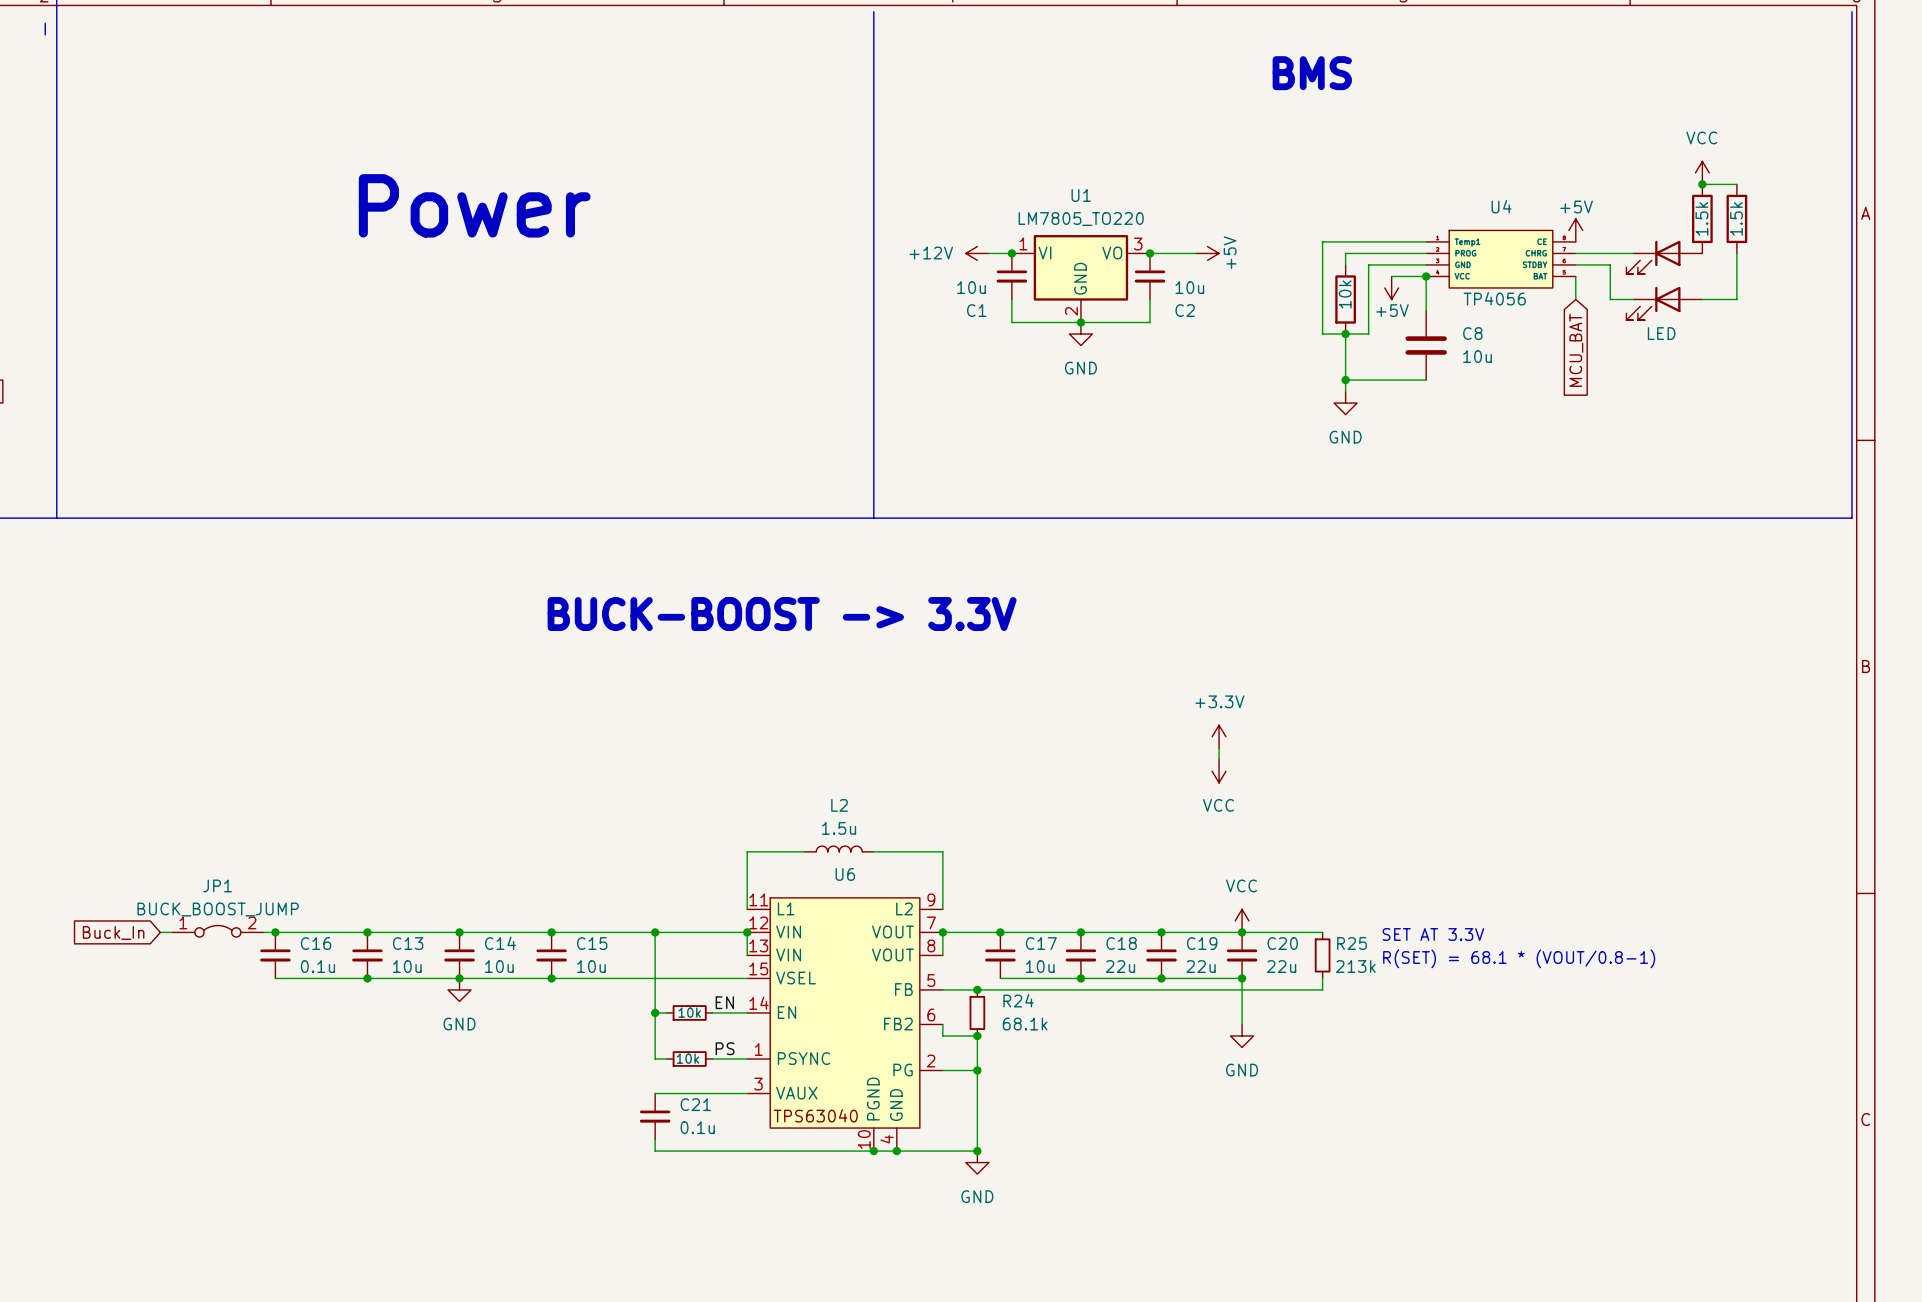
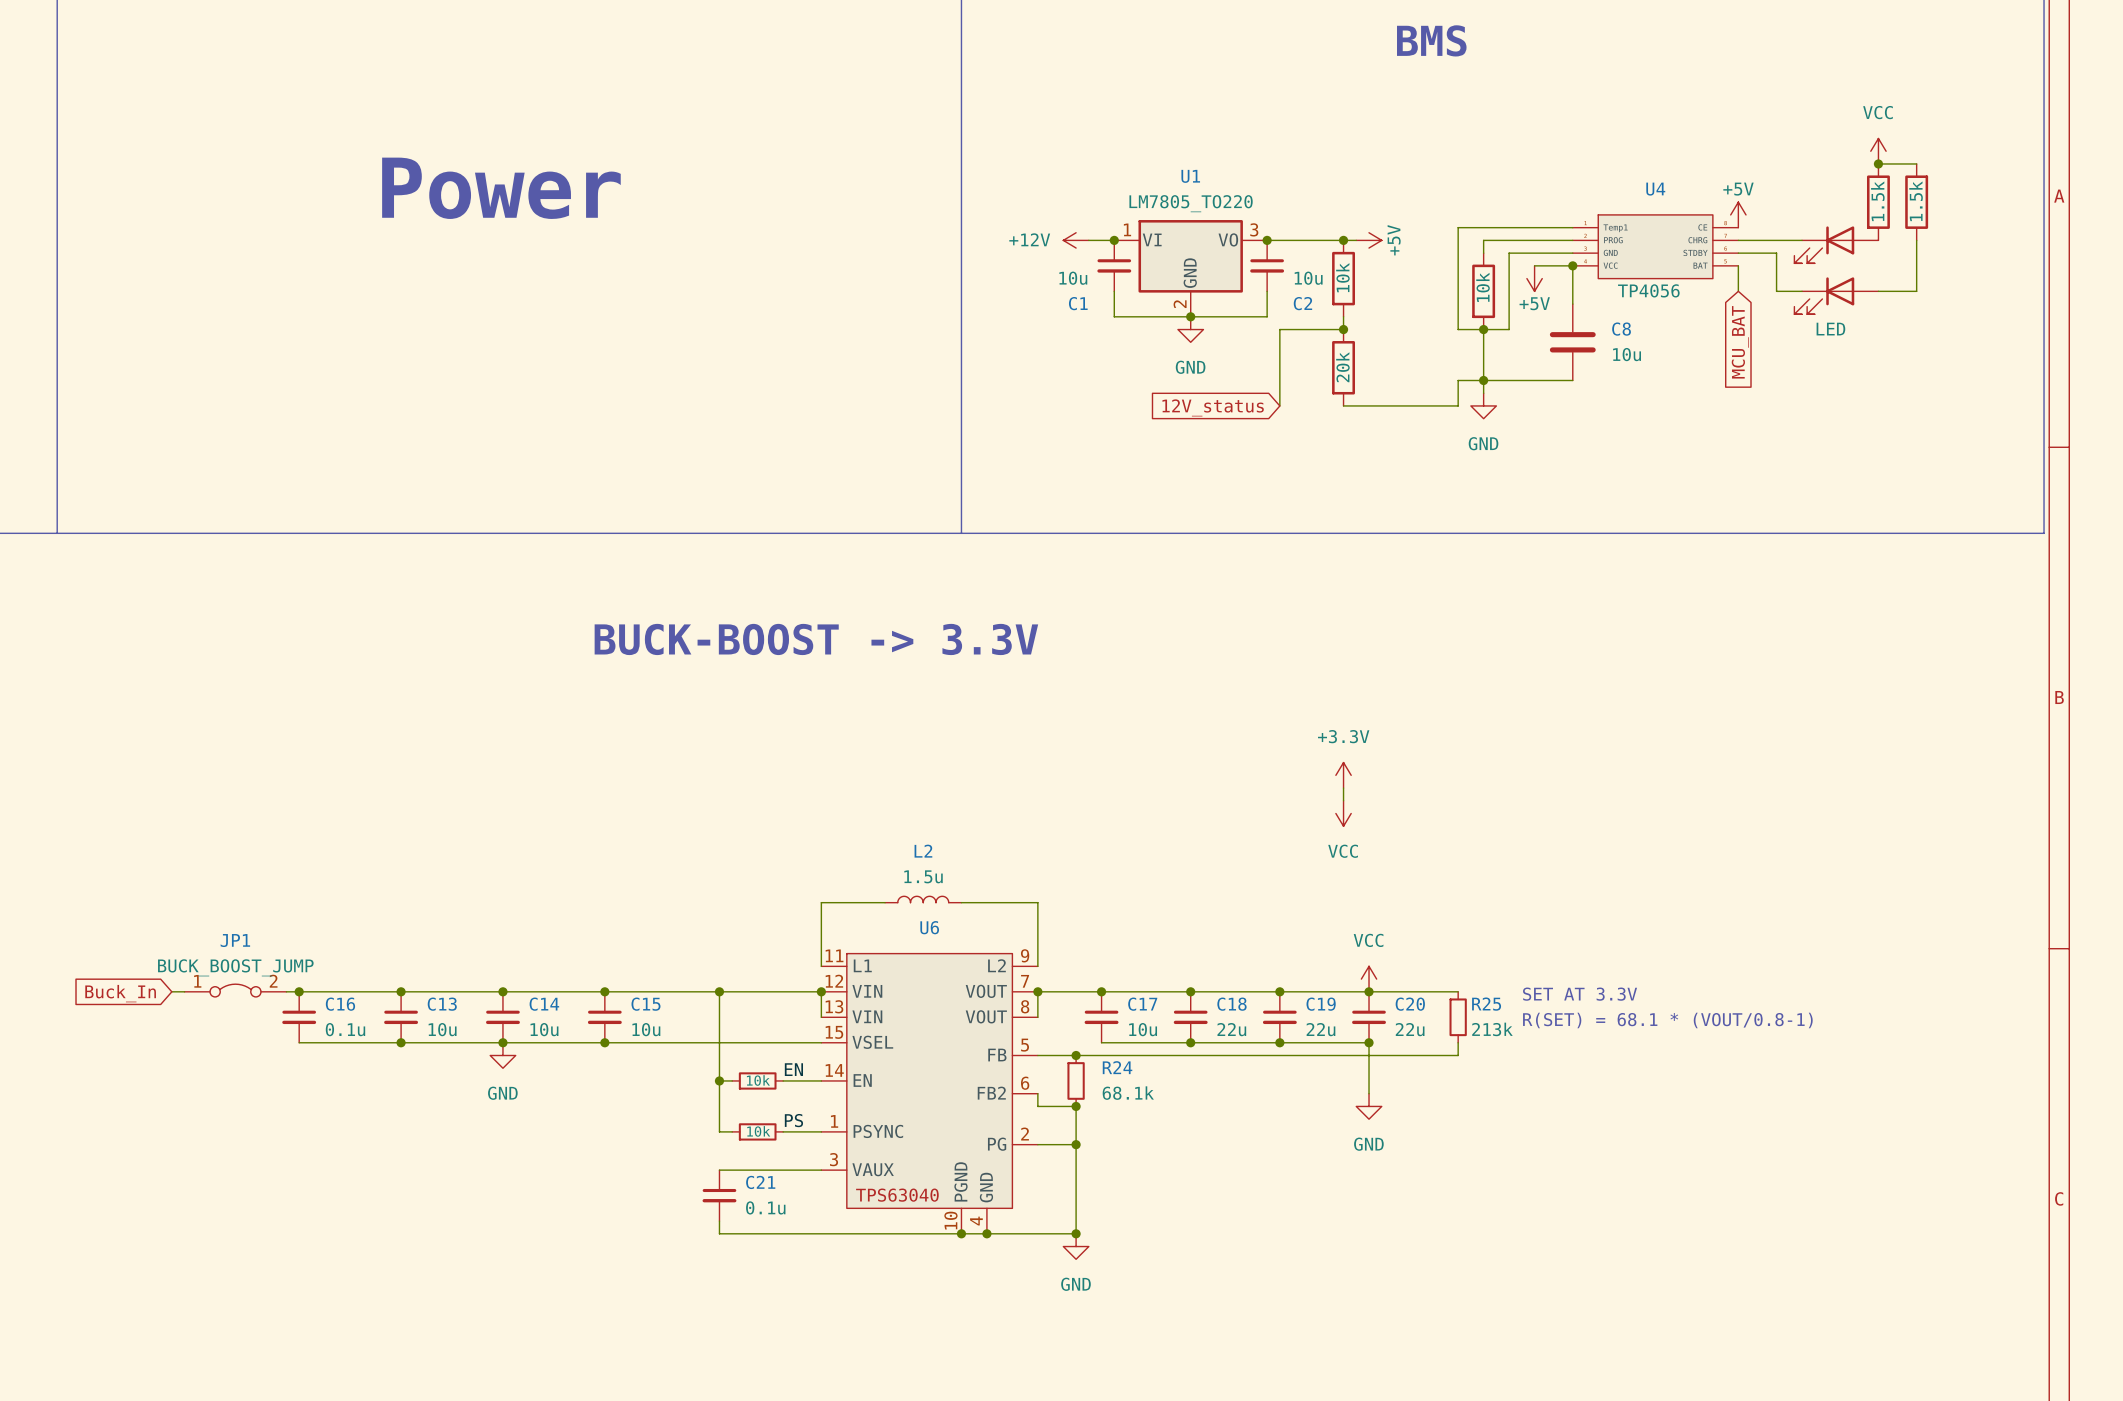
power symbol position: +5V (1207, 253) -> +5V (1369, 240)
junction: none -> (1343, 240)
part: none -> 10k (1343, 278)
wire: none -> (1343, 316) (1343, 329) (1279, 329) (1279, 405)
junction: none -> (1343, 329)
part: none -> 20k (1343, 367)
wire: none -> (1483, 380) (1458, 380) (1458, 405) (1343, 405)
global label: none -> 12V_status (1213, 407)

